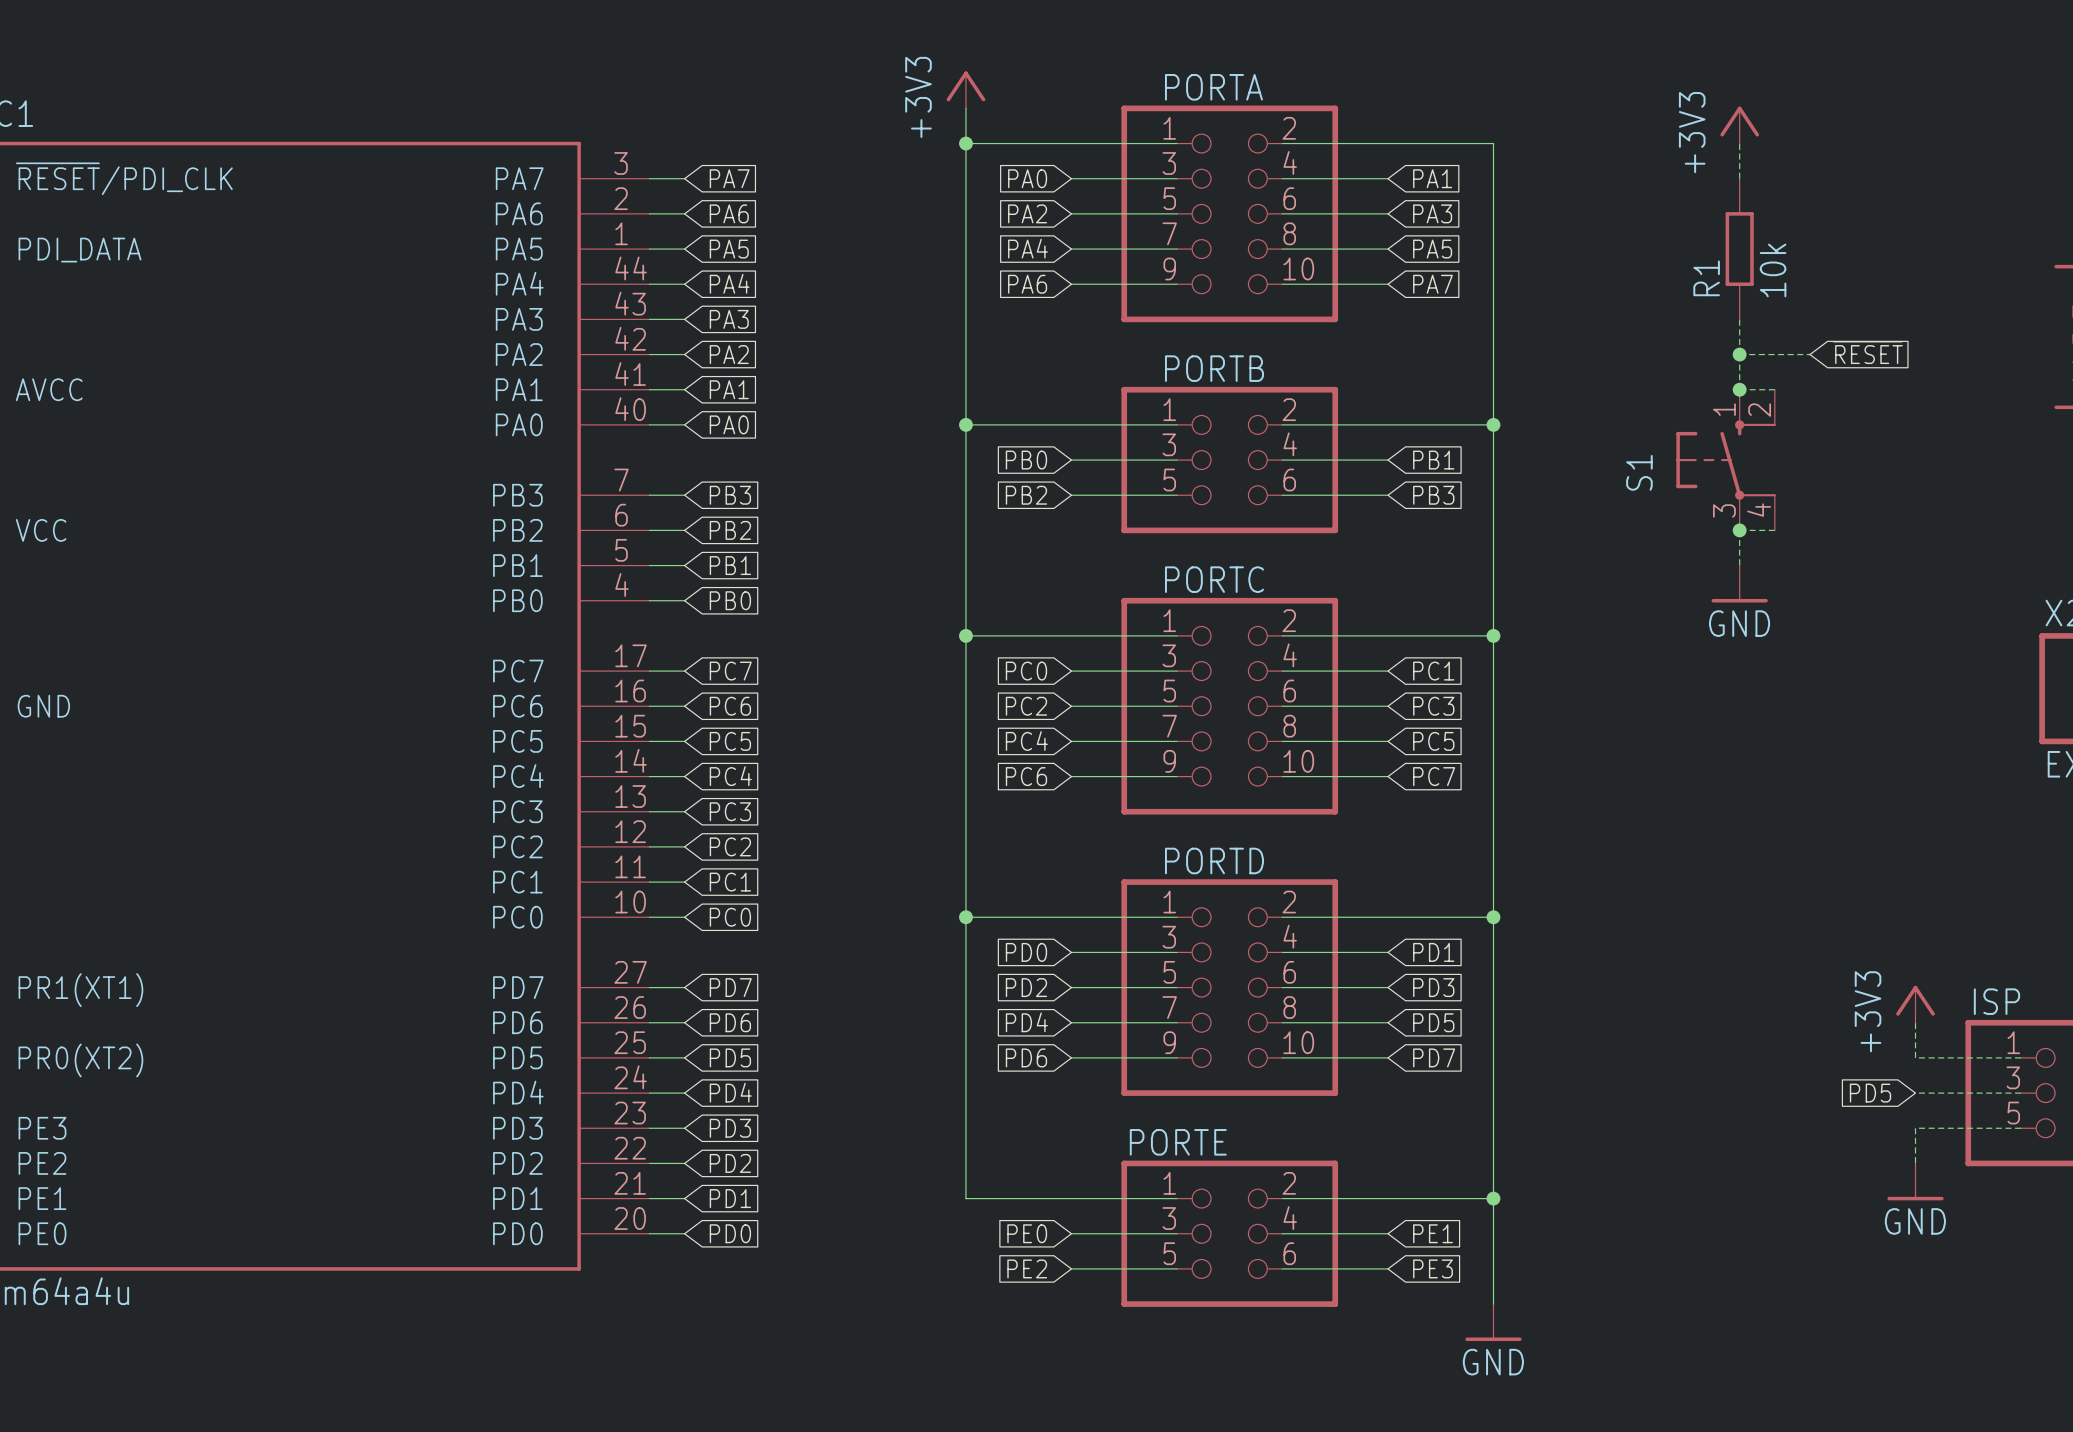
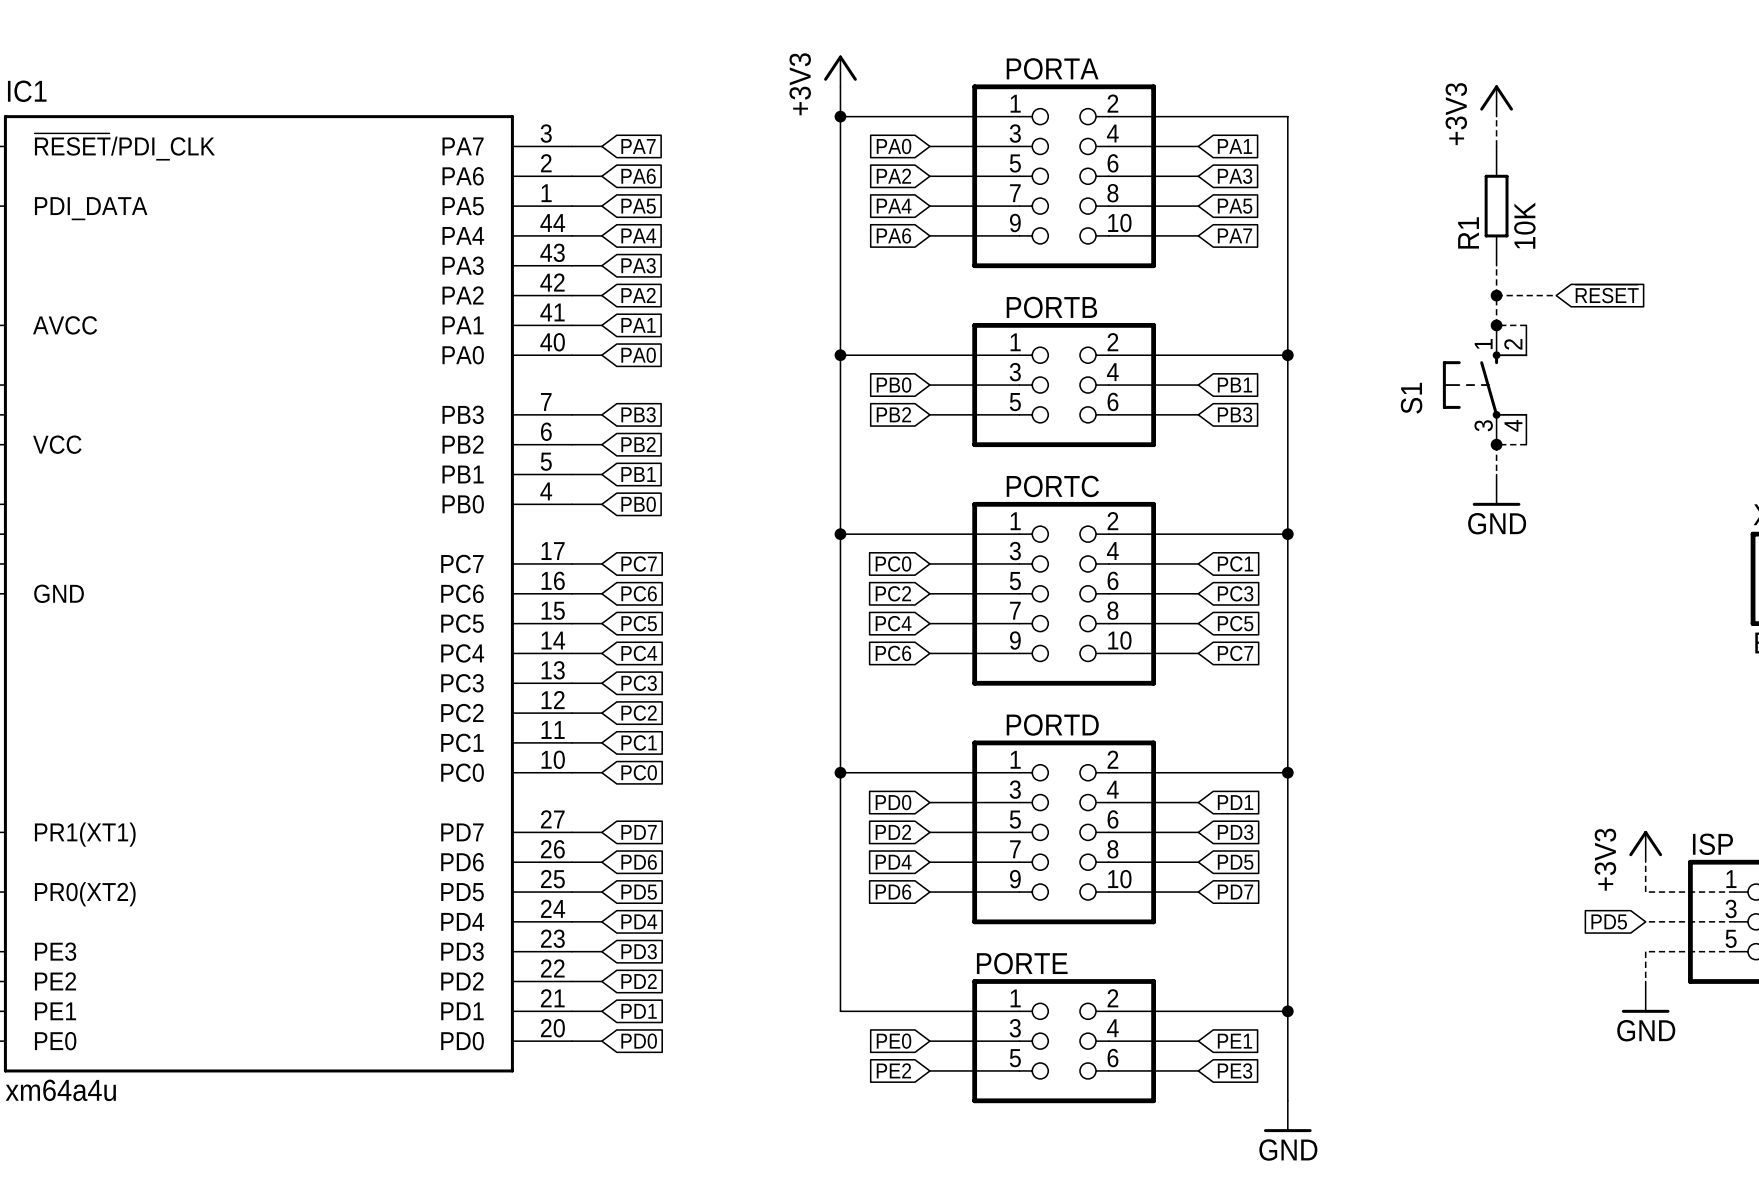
R1 value: 10k (1773, 270) -> 10K (1524, 225)

